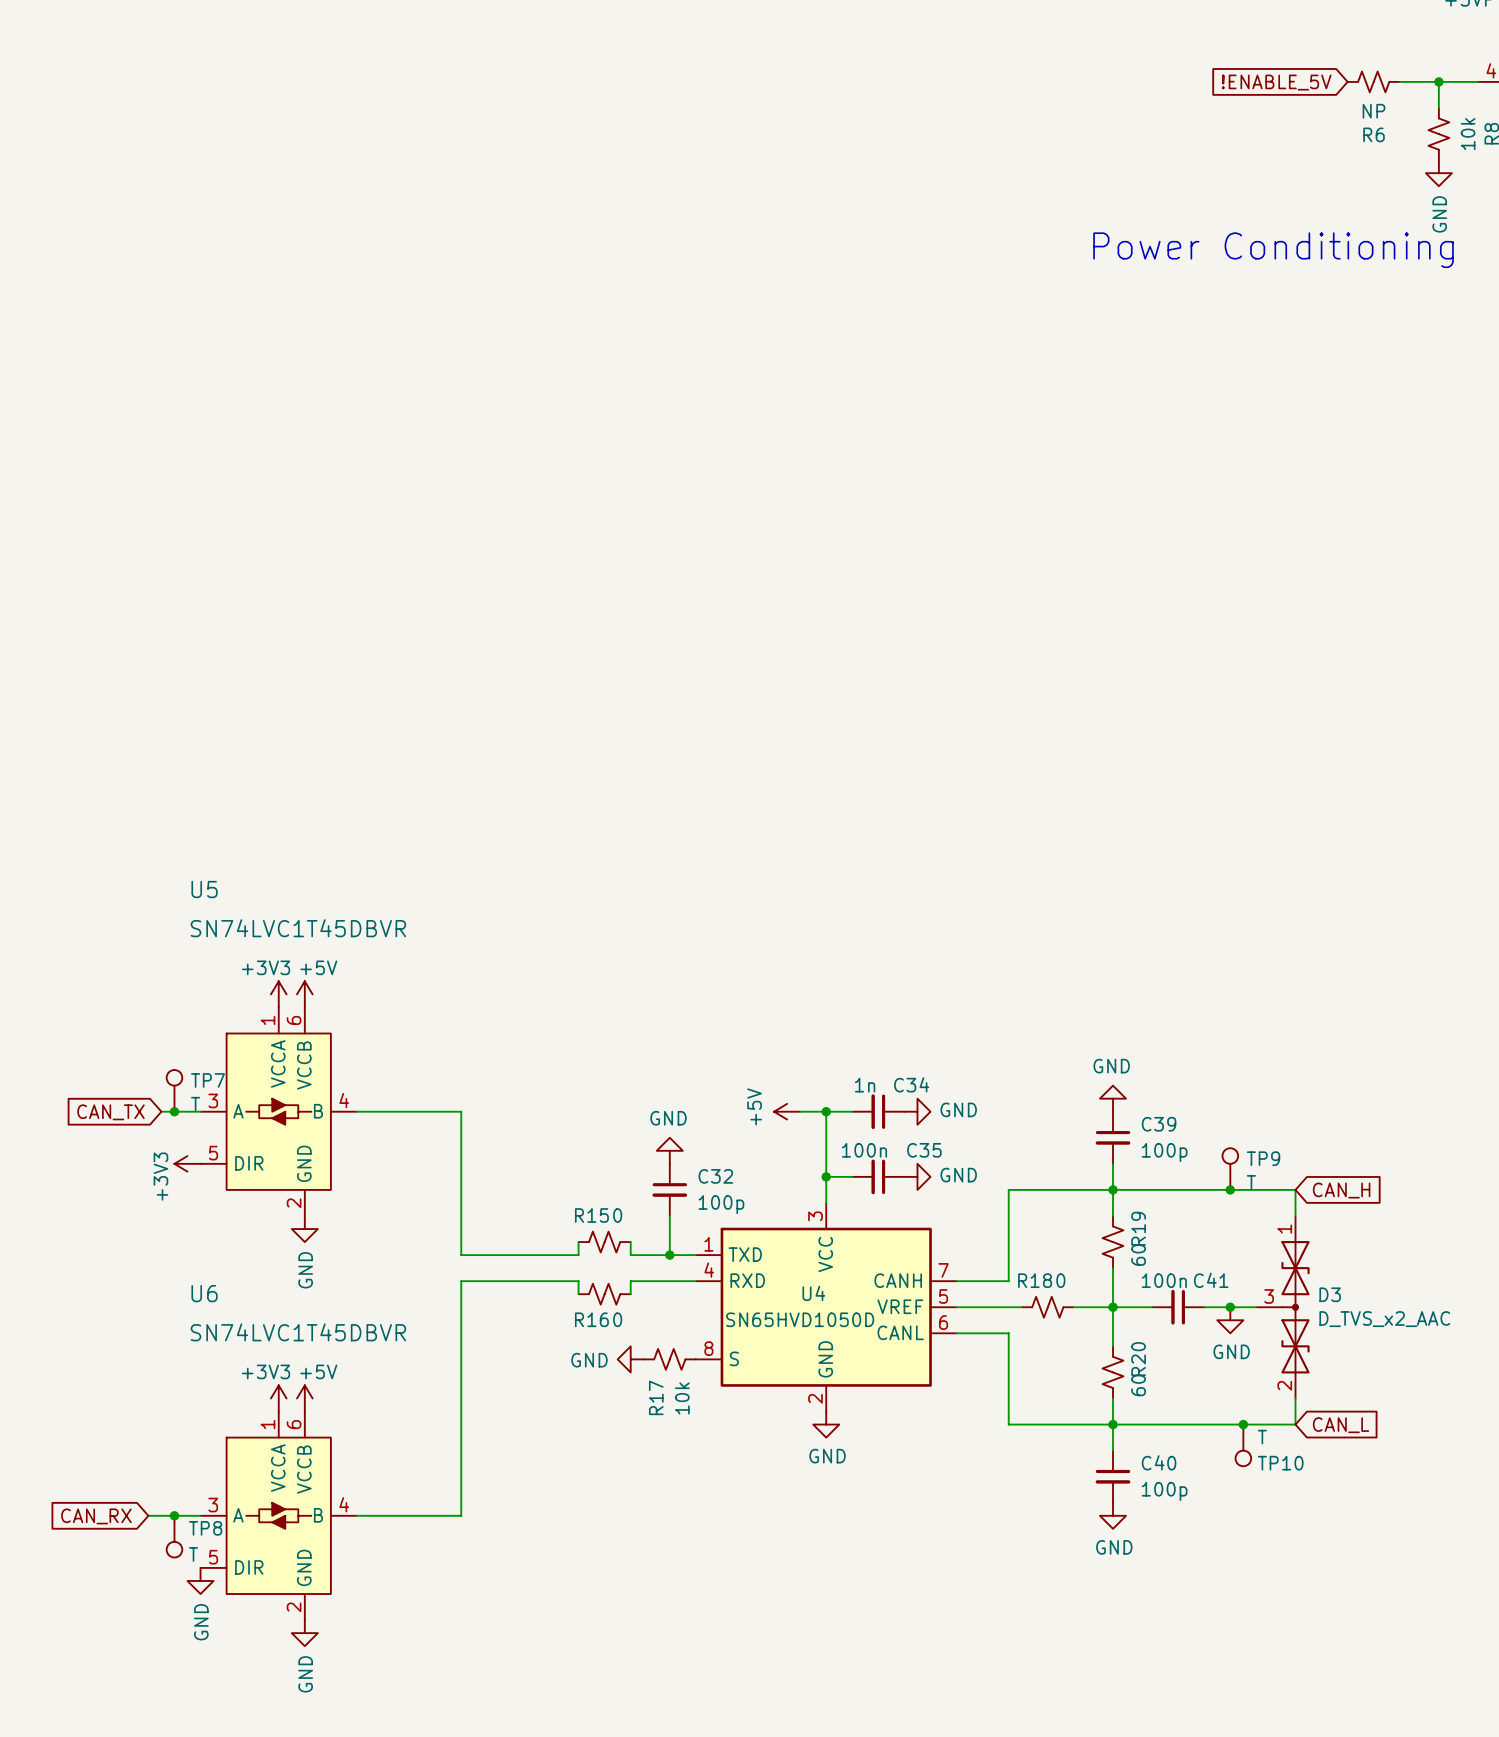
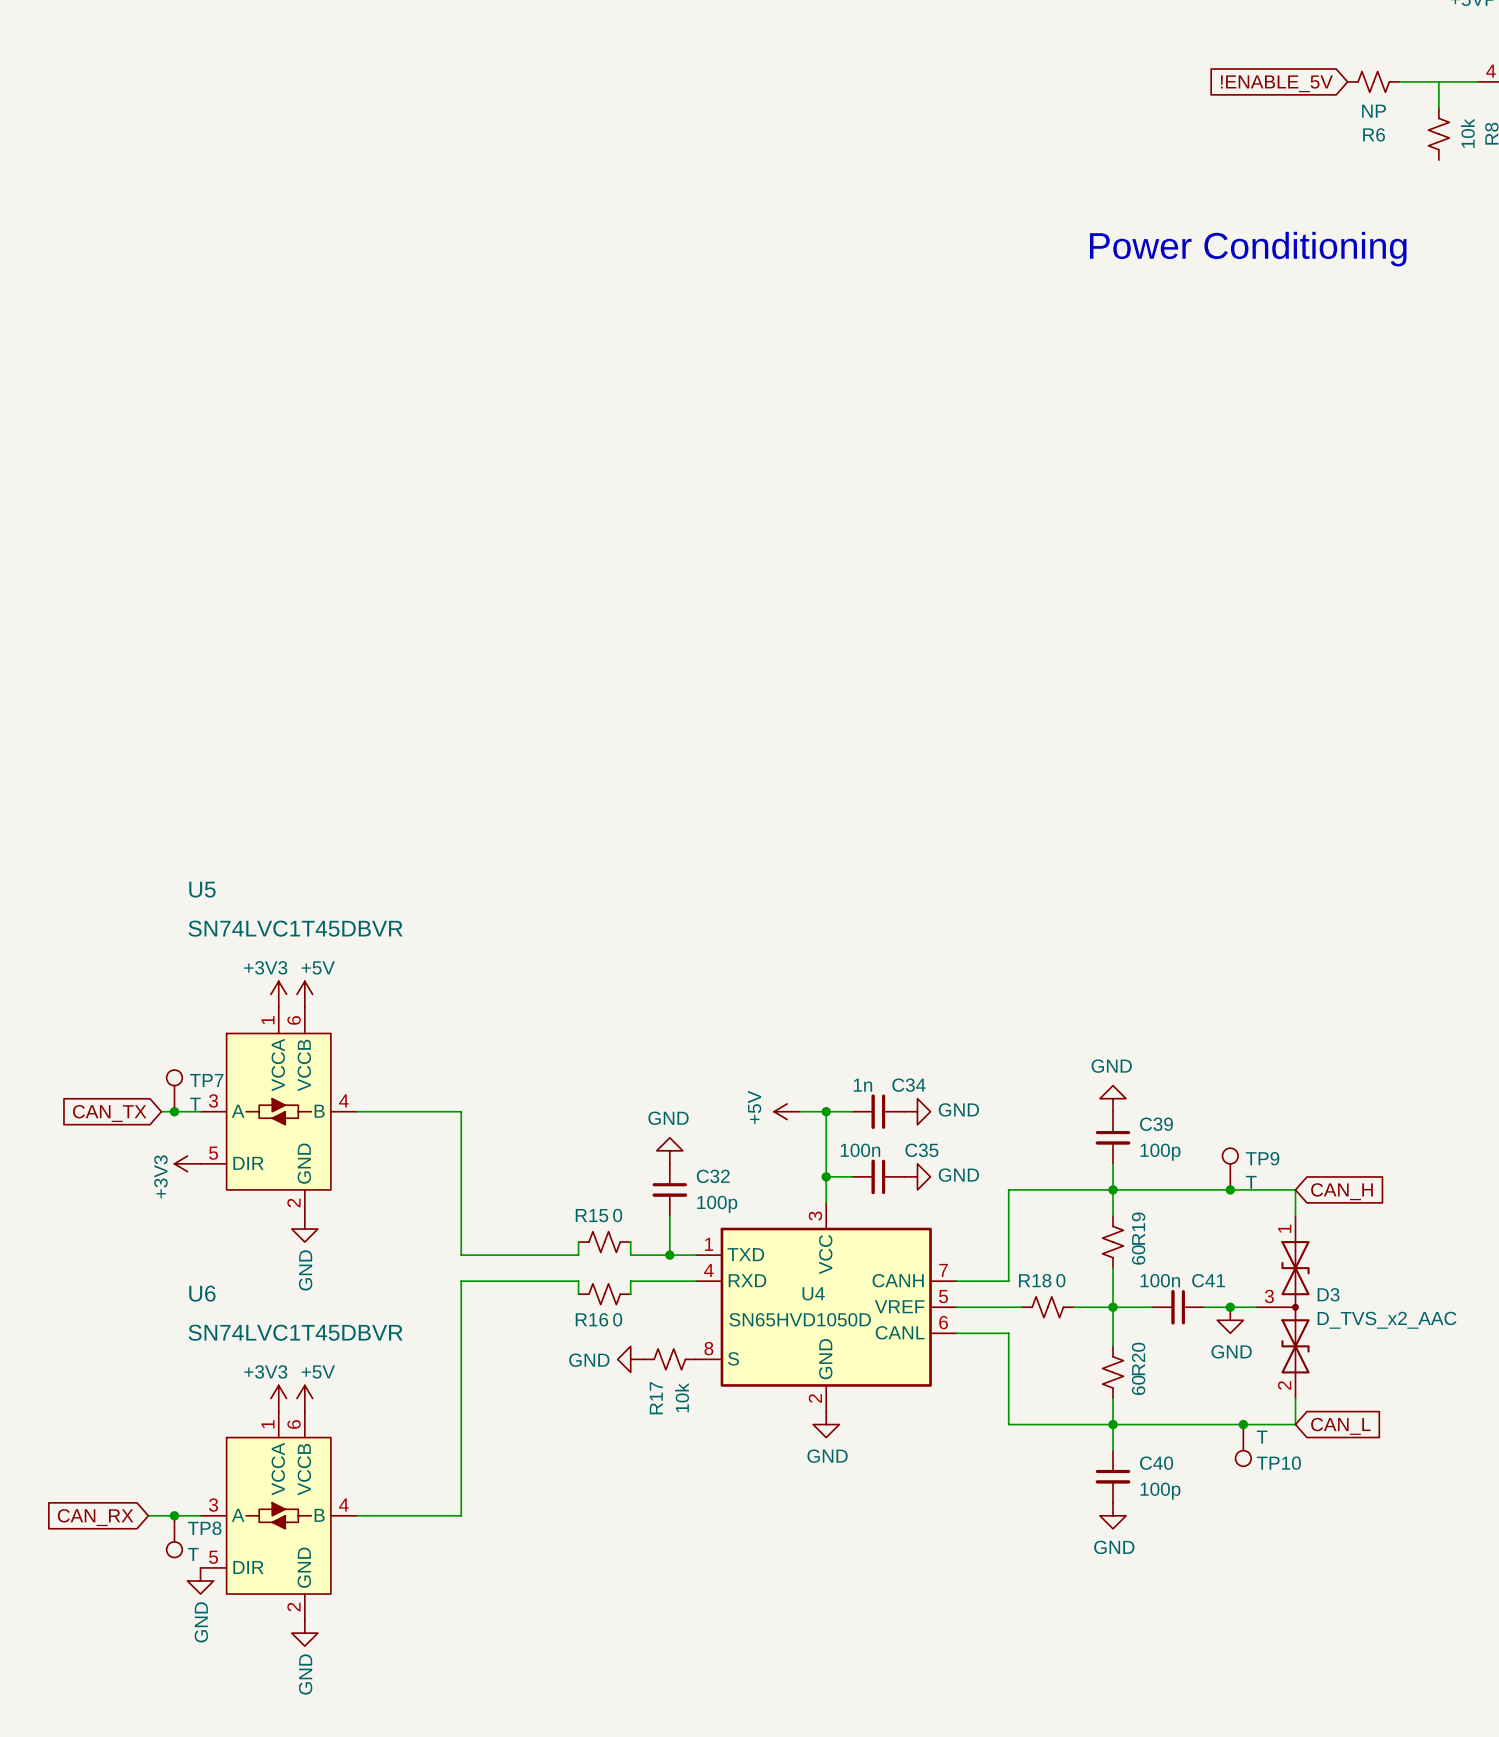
junction: (1438, 81) -> none
power symbol: GND (1438, 173) -> none

